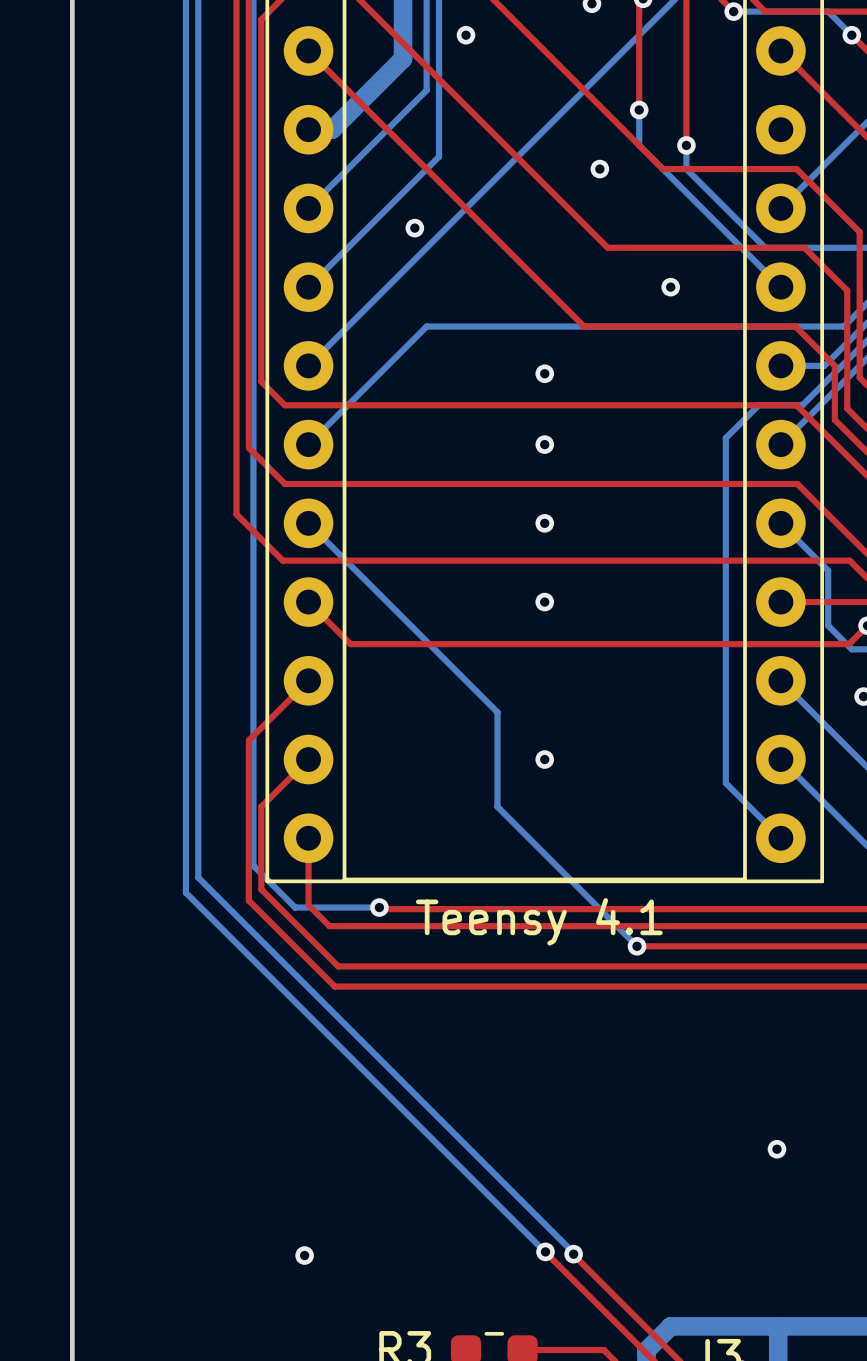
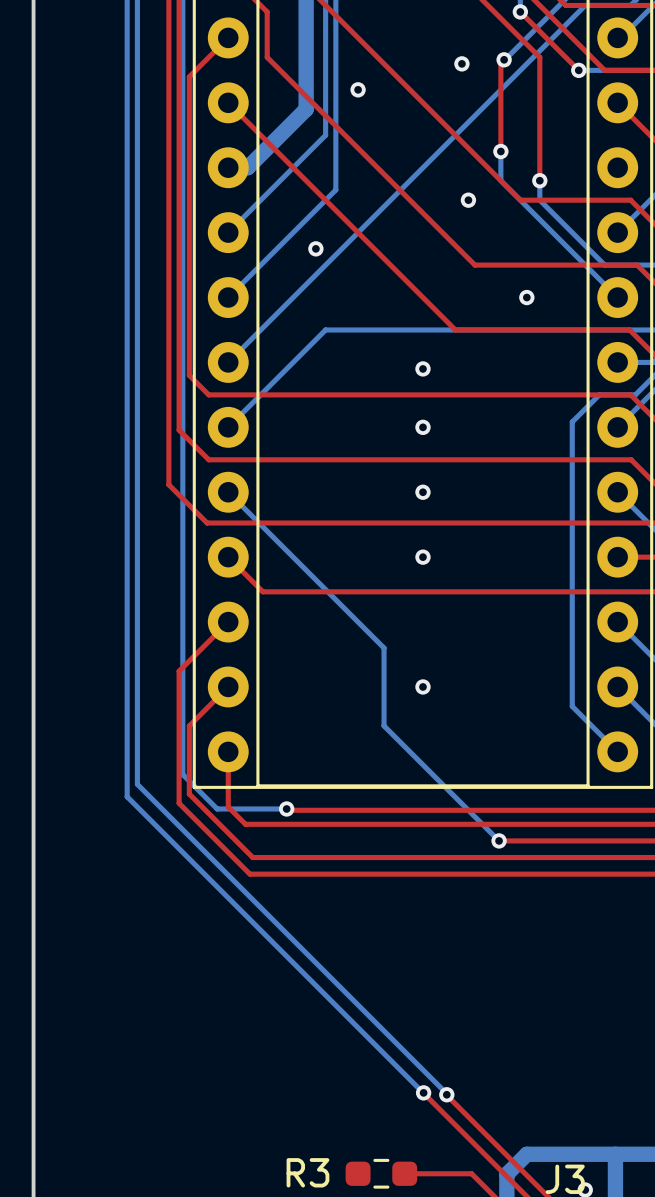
text: Teensy 4.1 (539, 921) -> none
via: (776, 1149) -> none
via: (304, 1255) -> none

